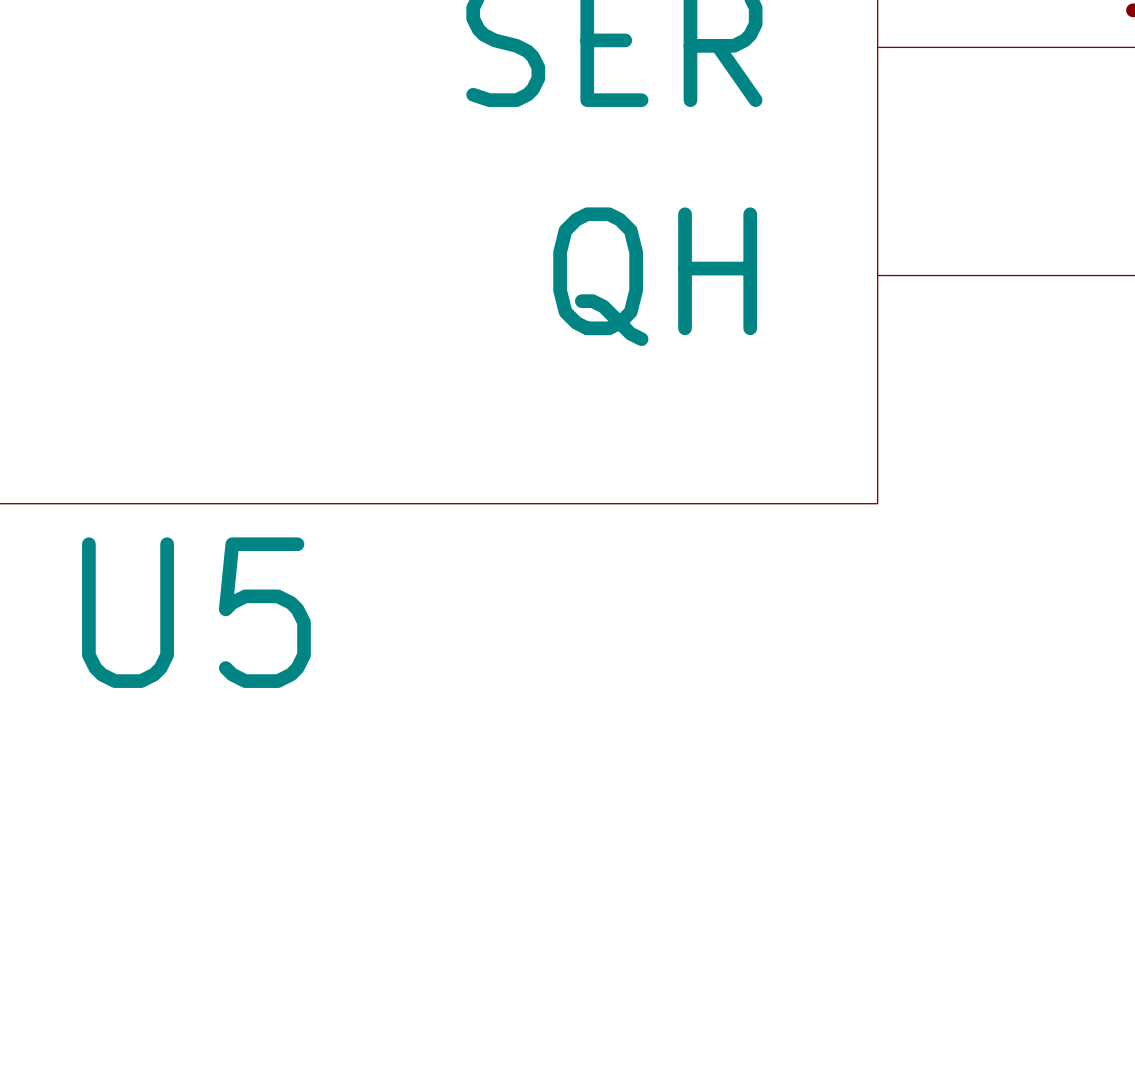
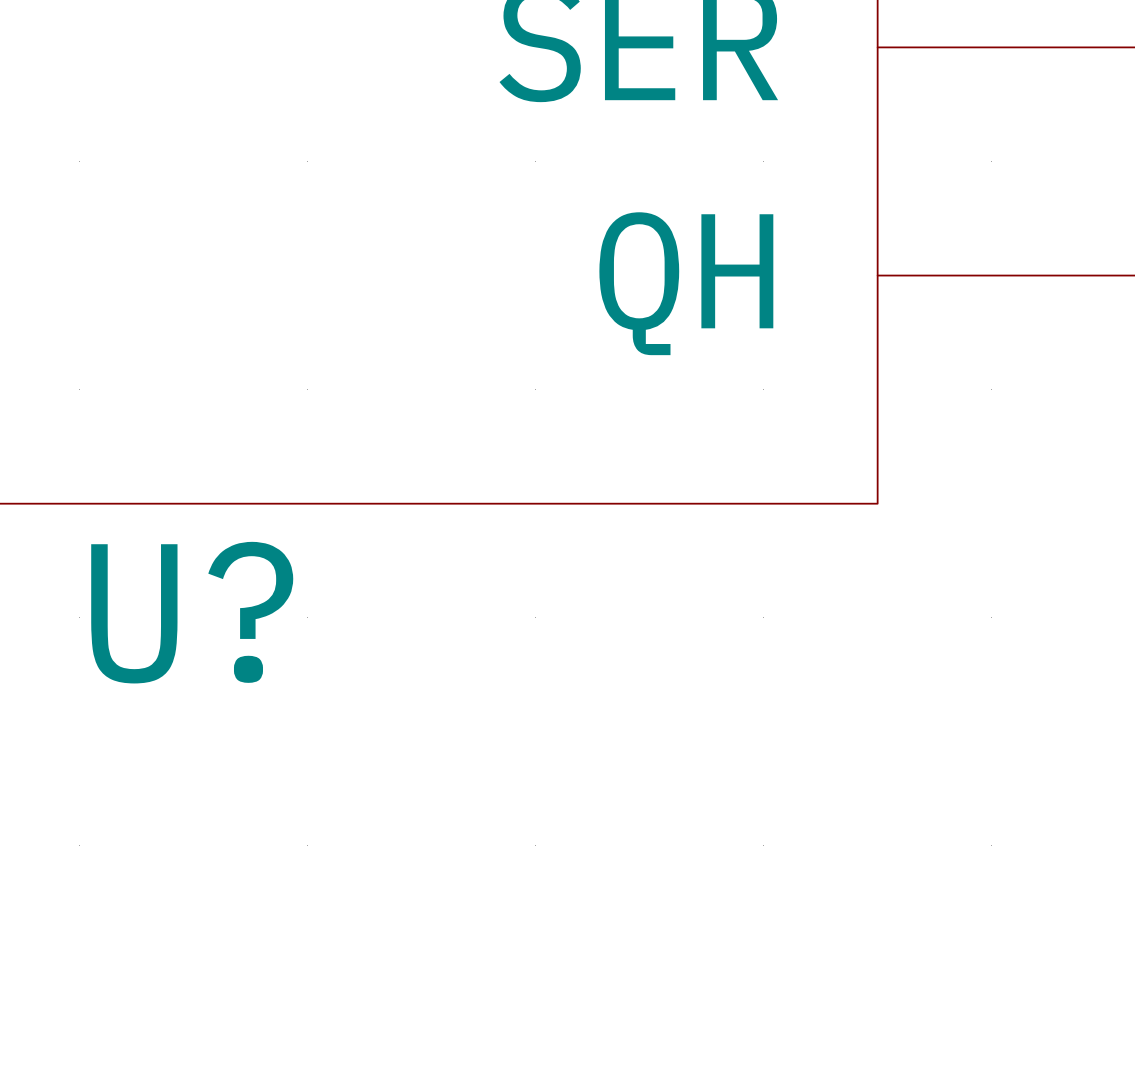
U5 name: U5 (196, 612) -> U? (192, 612)

